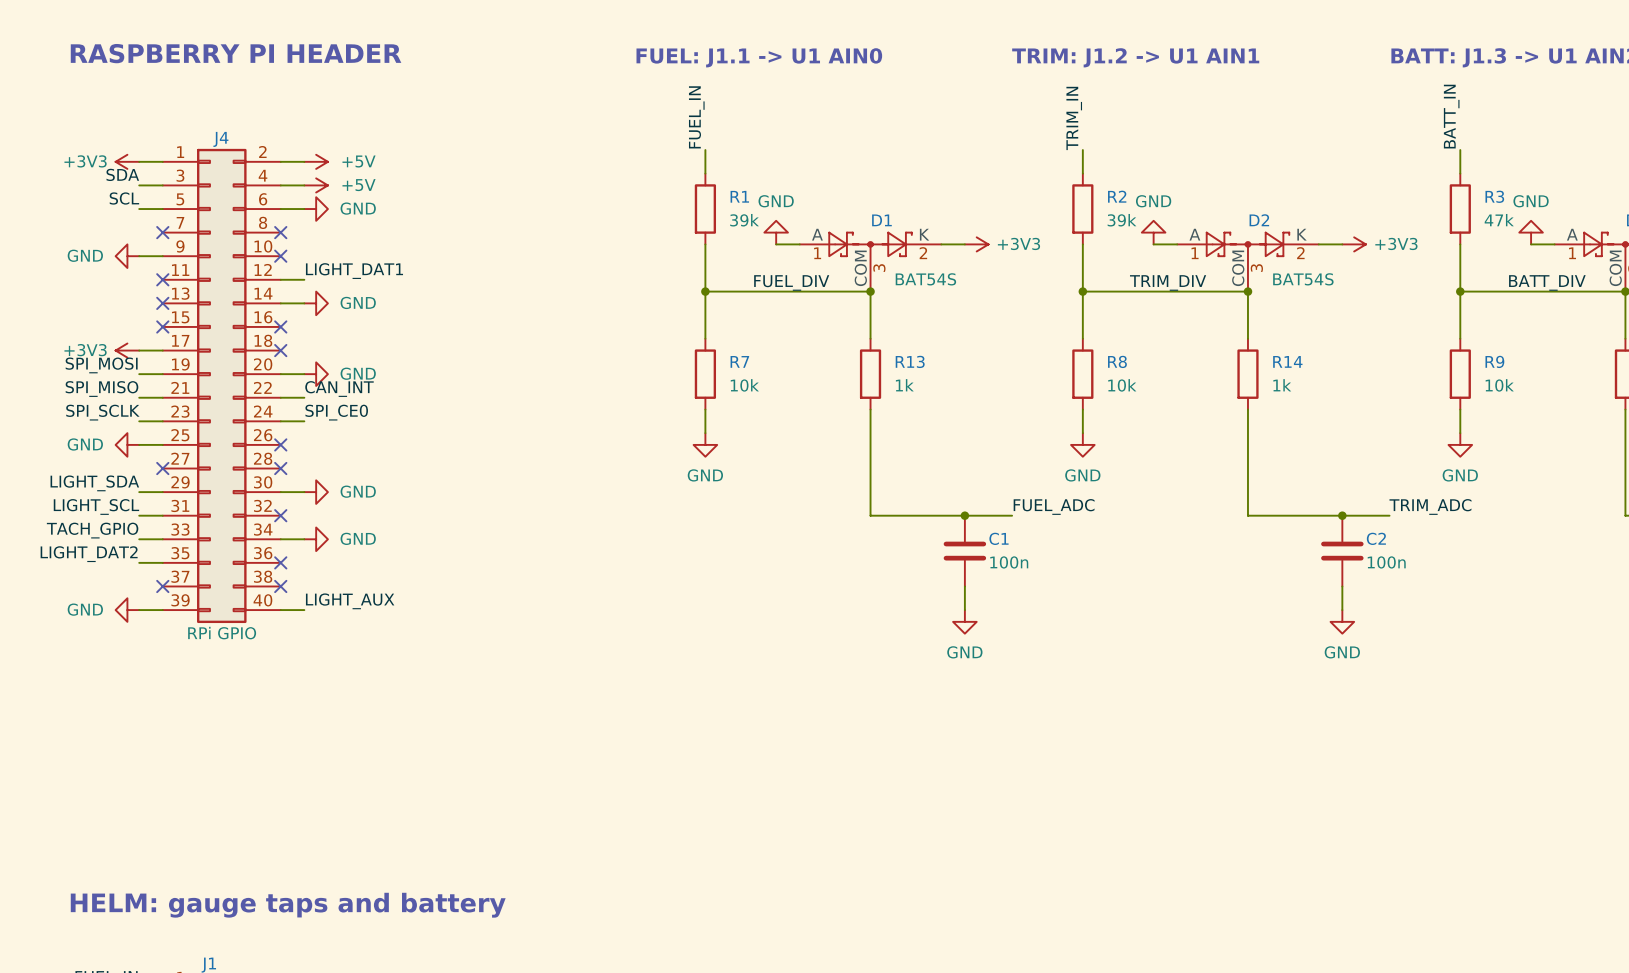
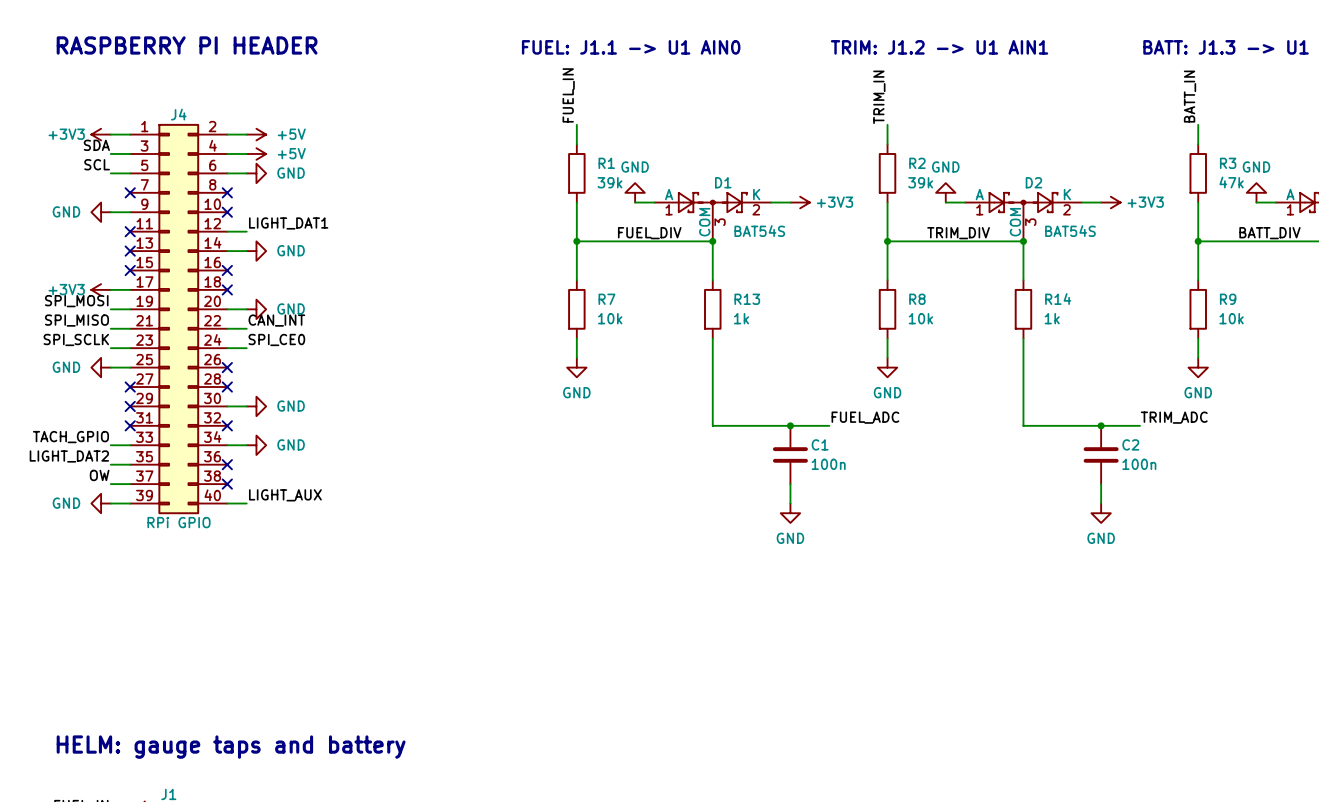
label: LIGHT_SDA (94, 483) -> none
wire: (139, 492) (162, 492) -> none
no-connect mark: none -> (130, 406)
label: LIGHT_SCL (96, 506) -> none
wire: (139, 515) (162, 515) -> (110, 484) (130, 484)
no-connect mark: none -> (130, 425)
label: none -> OW (99, 475)
no-connect mark: (162, 586) -> none

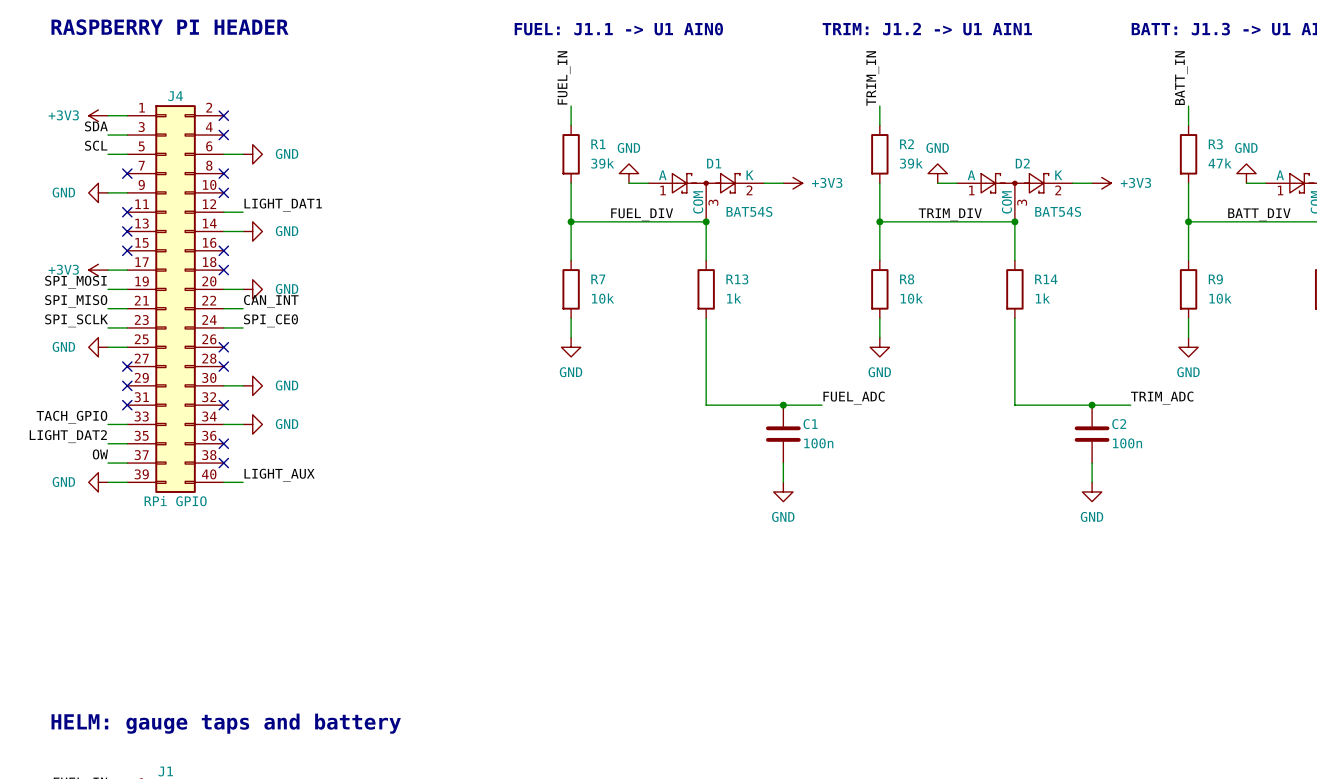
wire: (227, 134) (246, 134) -> none
no-connect mark: none -> (223, 115)
power symbol: +5V (256, 134) -> none
wire: (227, 153) (246, 153) -> none
no-connect mark: none -> (223, 135)
power symbol: +5V (256, 153) -> none

